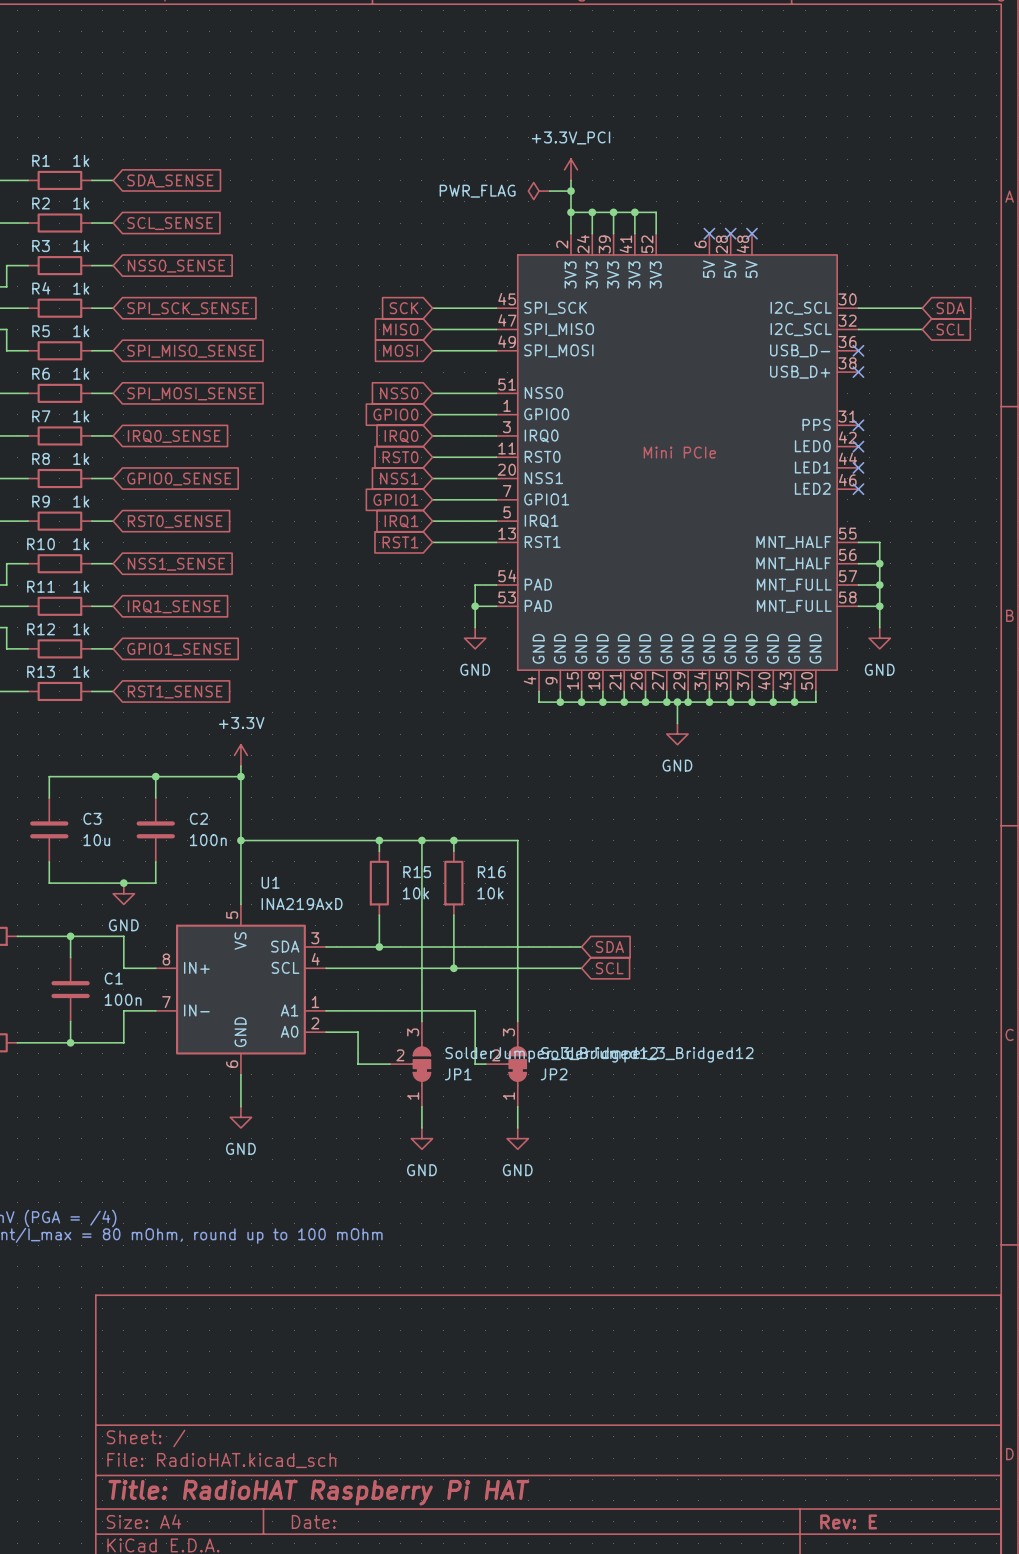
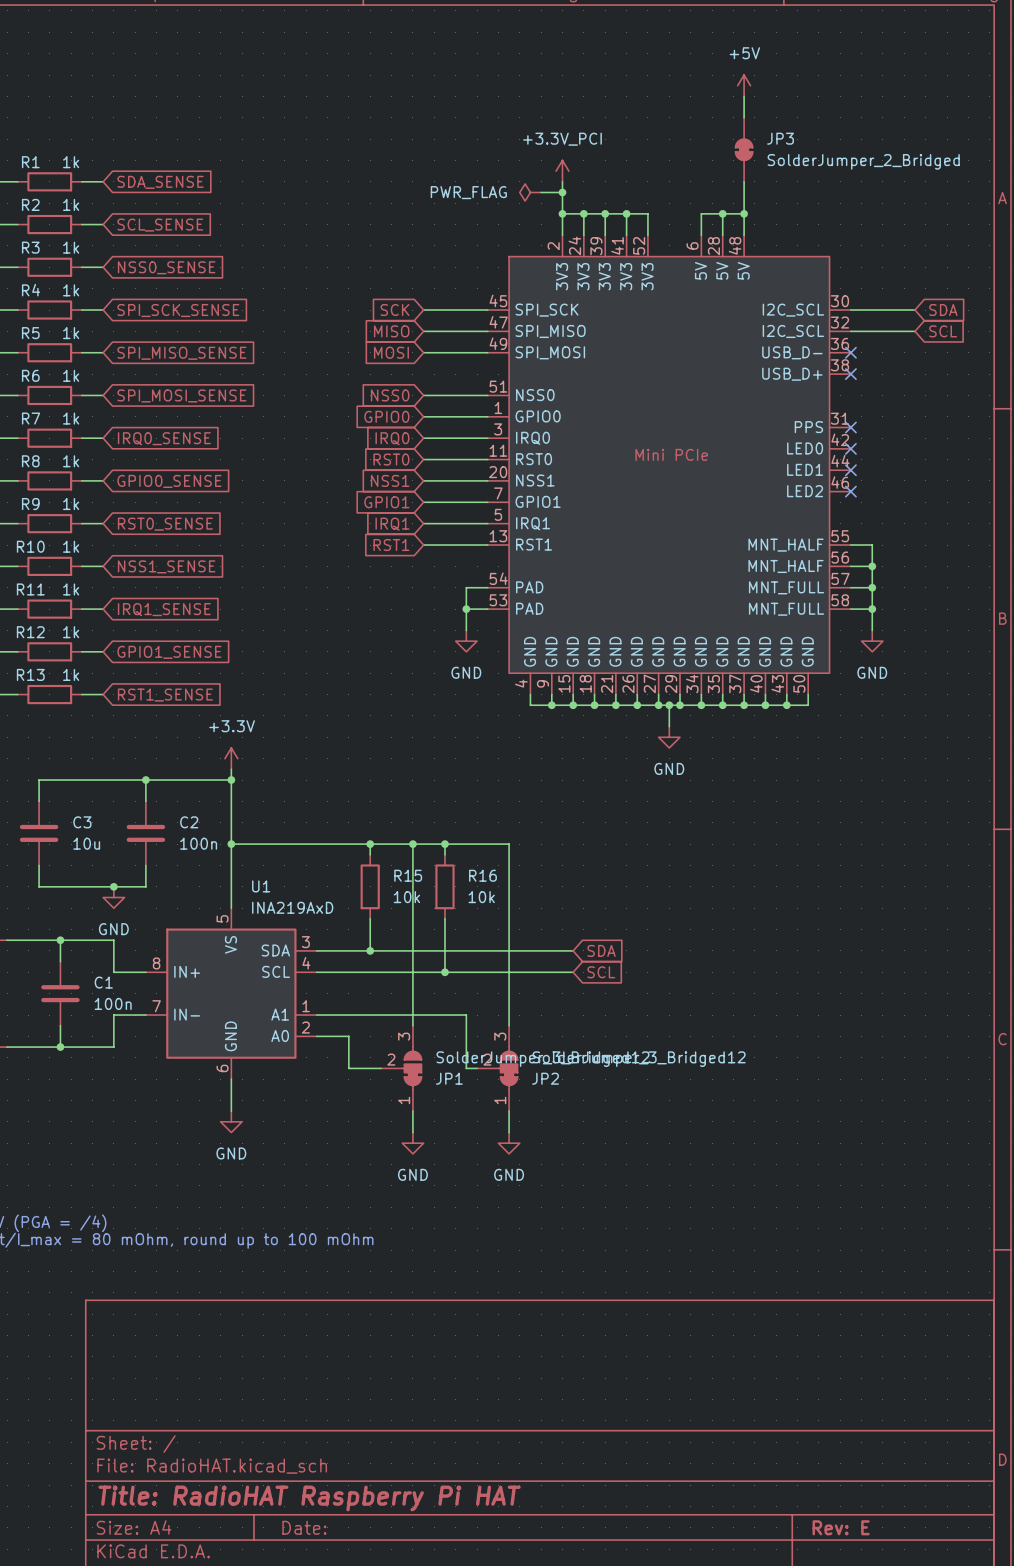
power symbol: none -> +5V (744, 85)
wire: none -> (744, 96) (744, 117)
JP3: none -> SolderJumper_2_Bridged (744, 149)
wire: none -> (744, 181) (744, 235)
wire: none -> (722, 213) (722, 235)
junction: none -> (722, 213)
wire: none -> (744, 213) (701, 213) (701, 235)
junction: none -> (744, 213)
no-connect mark: (709, 233) -> none
no-connect mark: (730, 233) -> none
no-connect mark: (751, 233) -> none

